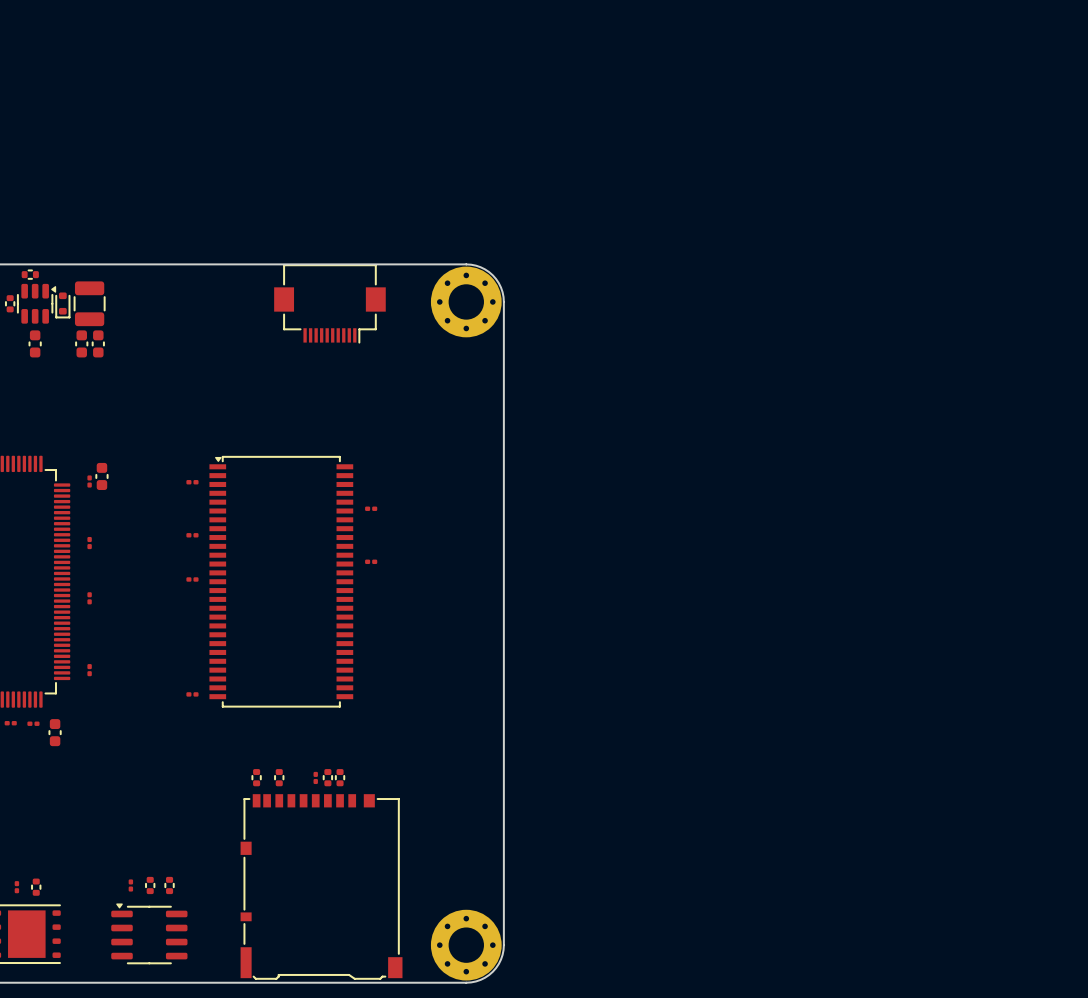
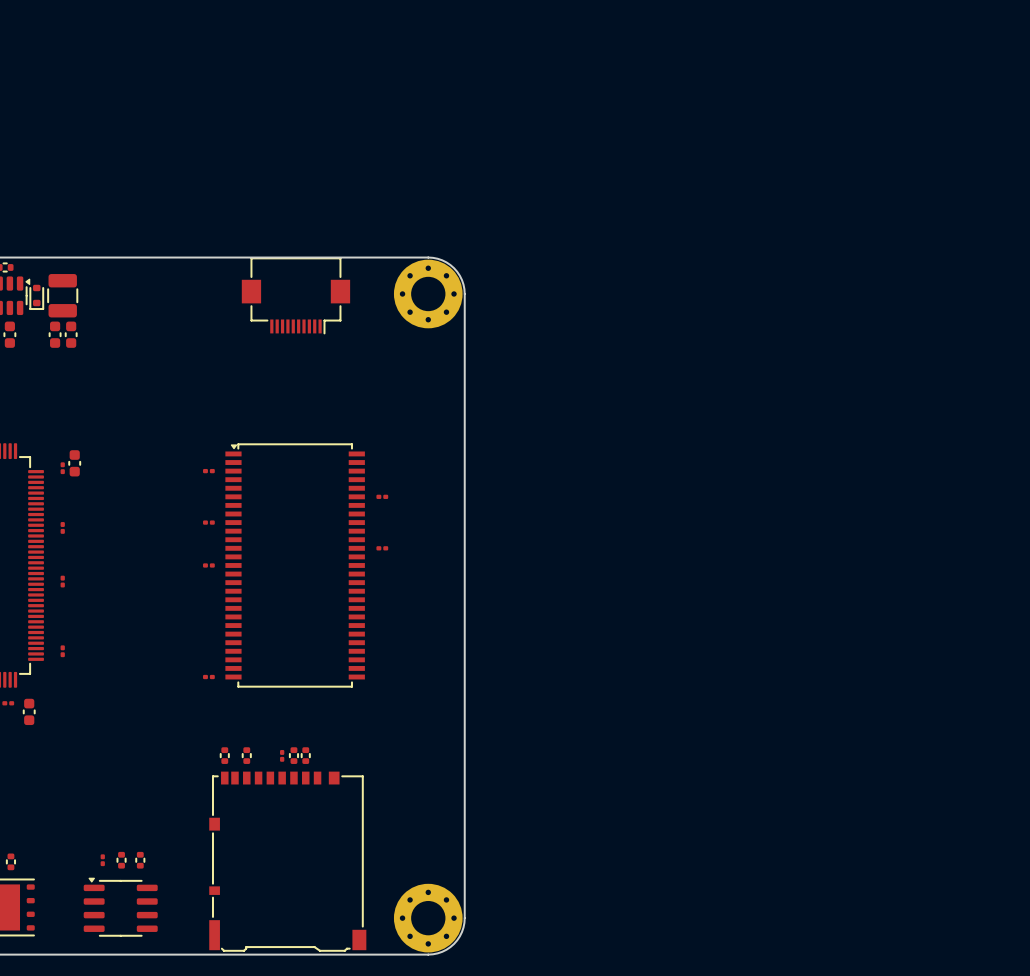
part: (192, 482) -> none
part: none -> (208, 471)
part: (371, 508) -> none
part: none -> (382, 496)
part: (192, 535) -> none
part: none -> (208, 522)
part: (371, 561) -> none
part: none -> (382, 548)
part: (192, 579) -> none
part: none -> (208, 565)
part position: (281, 581) -> (295, 565)
part position: (192, 694) -> (208, 677)

